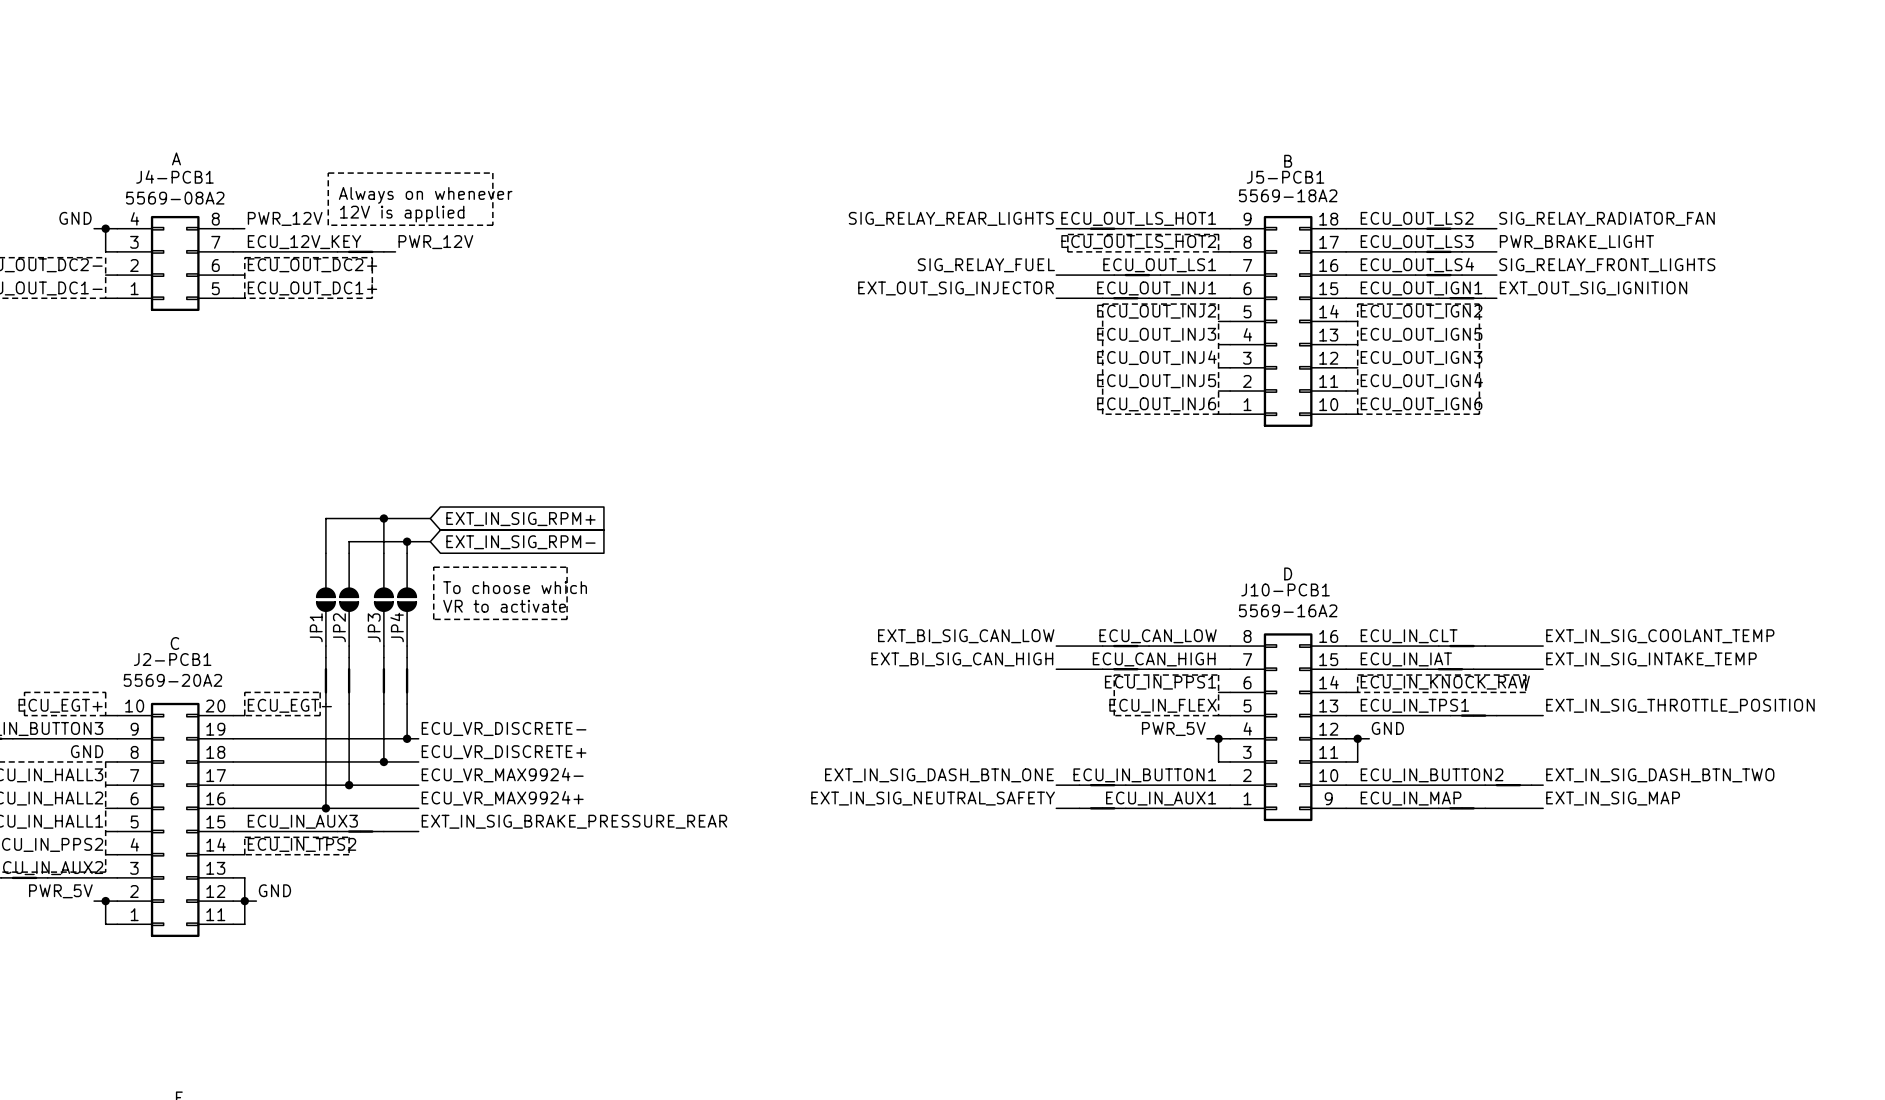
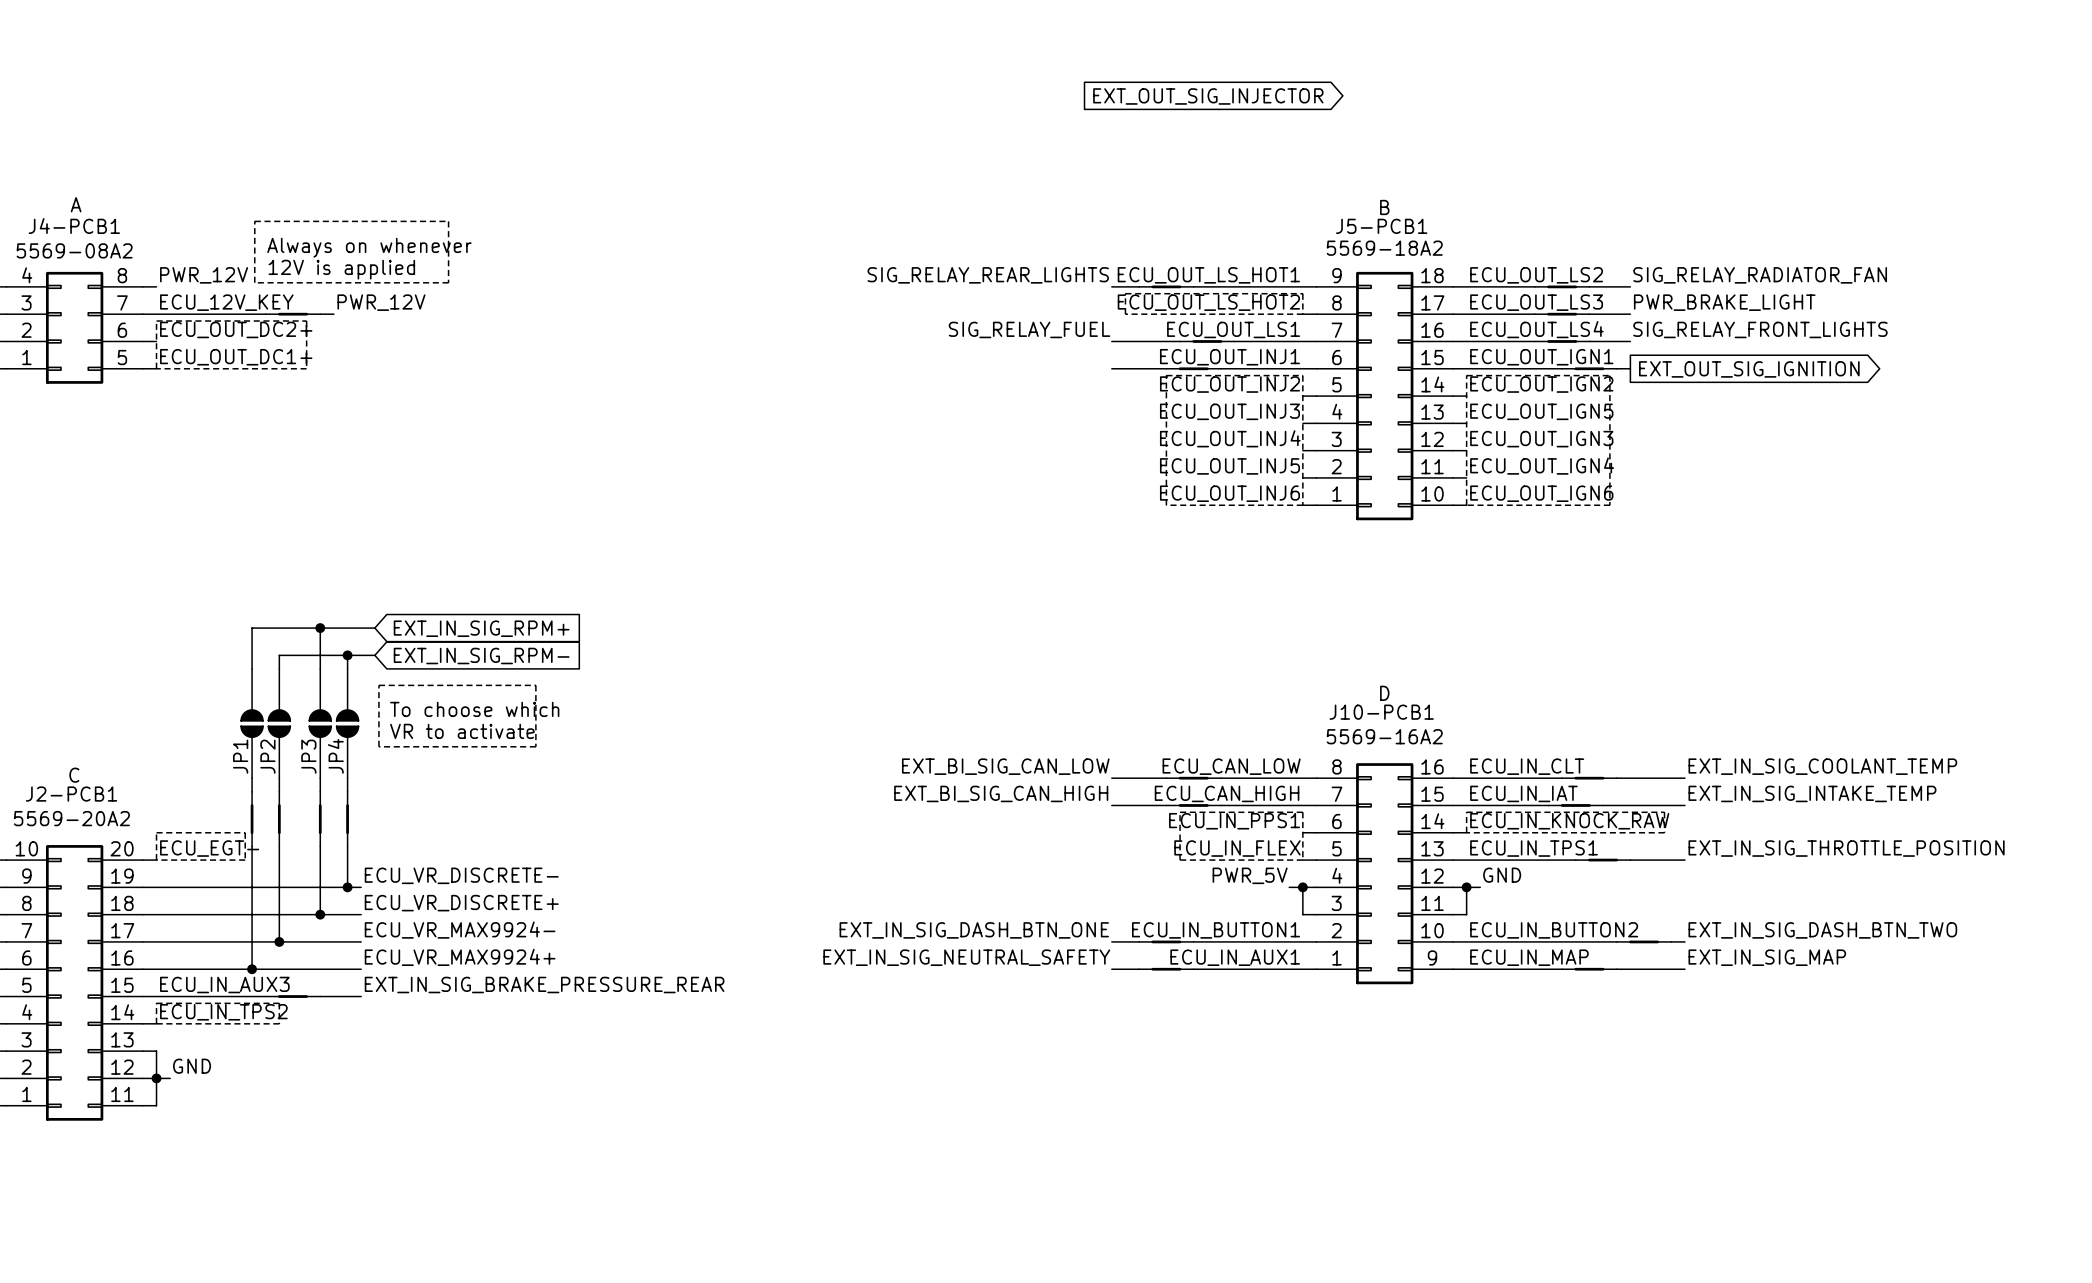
global label: none -> EXT_OUT_SIG_INJECTOR (1208, 96)
label: EXT_OUT_SIG_INJECTOR (956, 288) -> none
label: EXT_OUT_SIG_IGNITION (1593, 288) -> none
global label: none -> EXT_OUT_SIG_IGNITION (1749, 369)

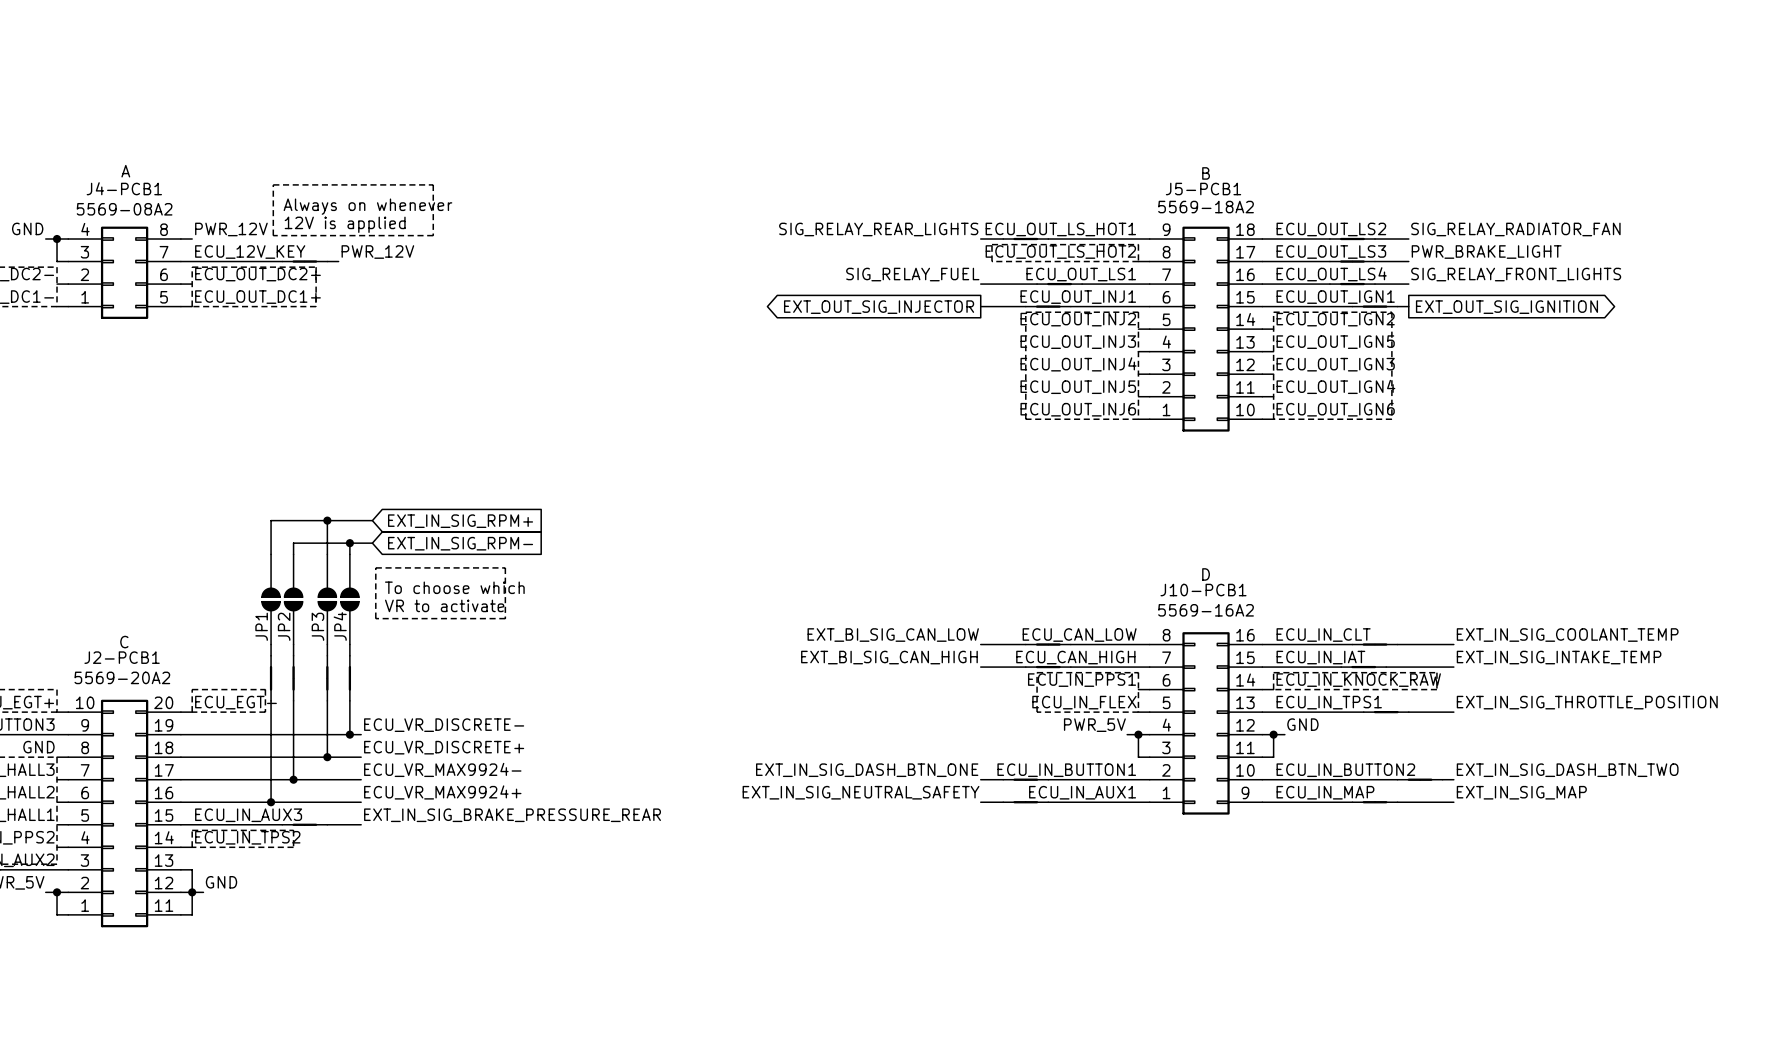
global label: EXT_OUT_SIG_INJECTOR (1208, 96) -> none
global label: none -> EXT_OUT_SIG_INJECTOR (879, 307)

